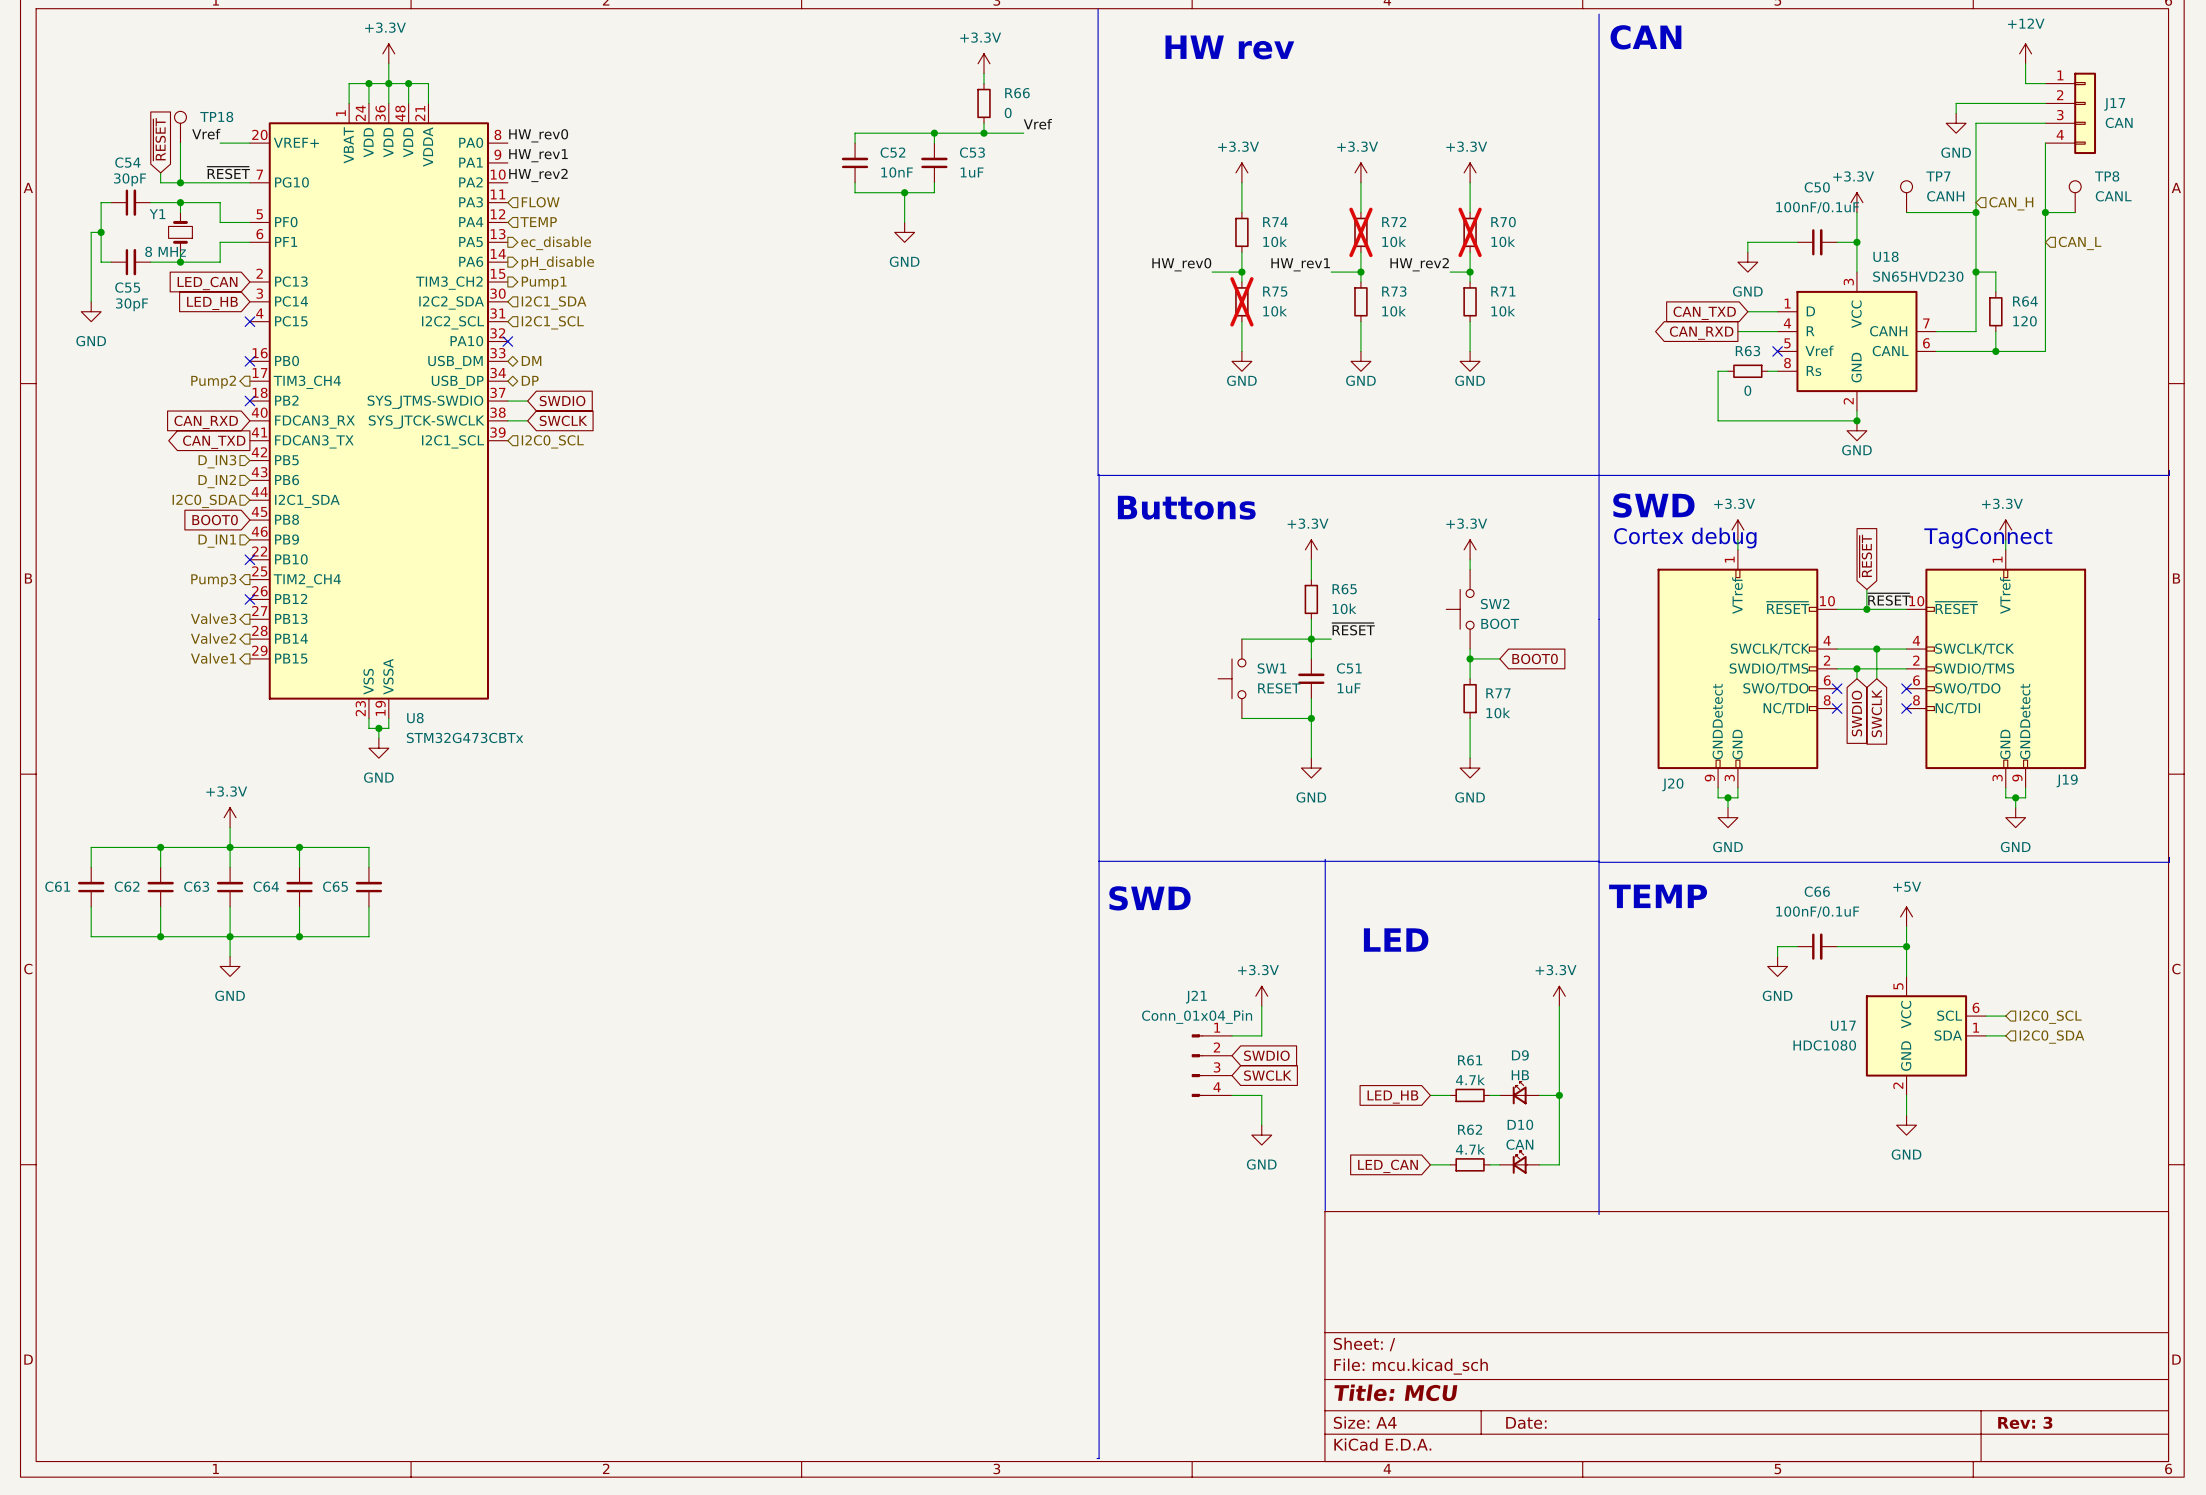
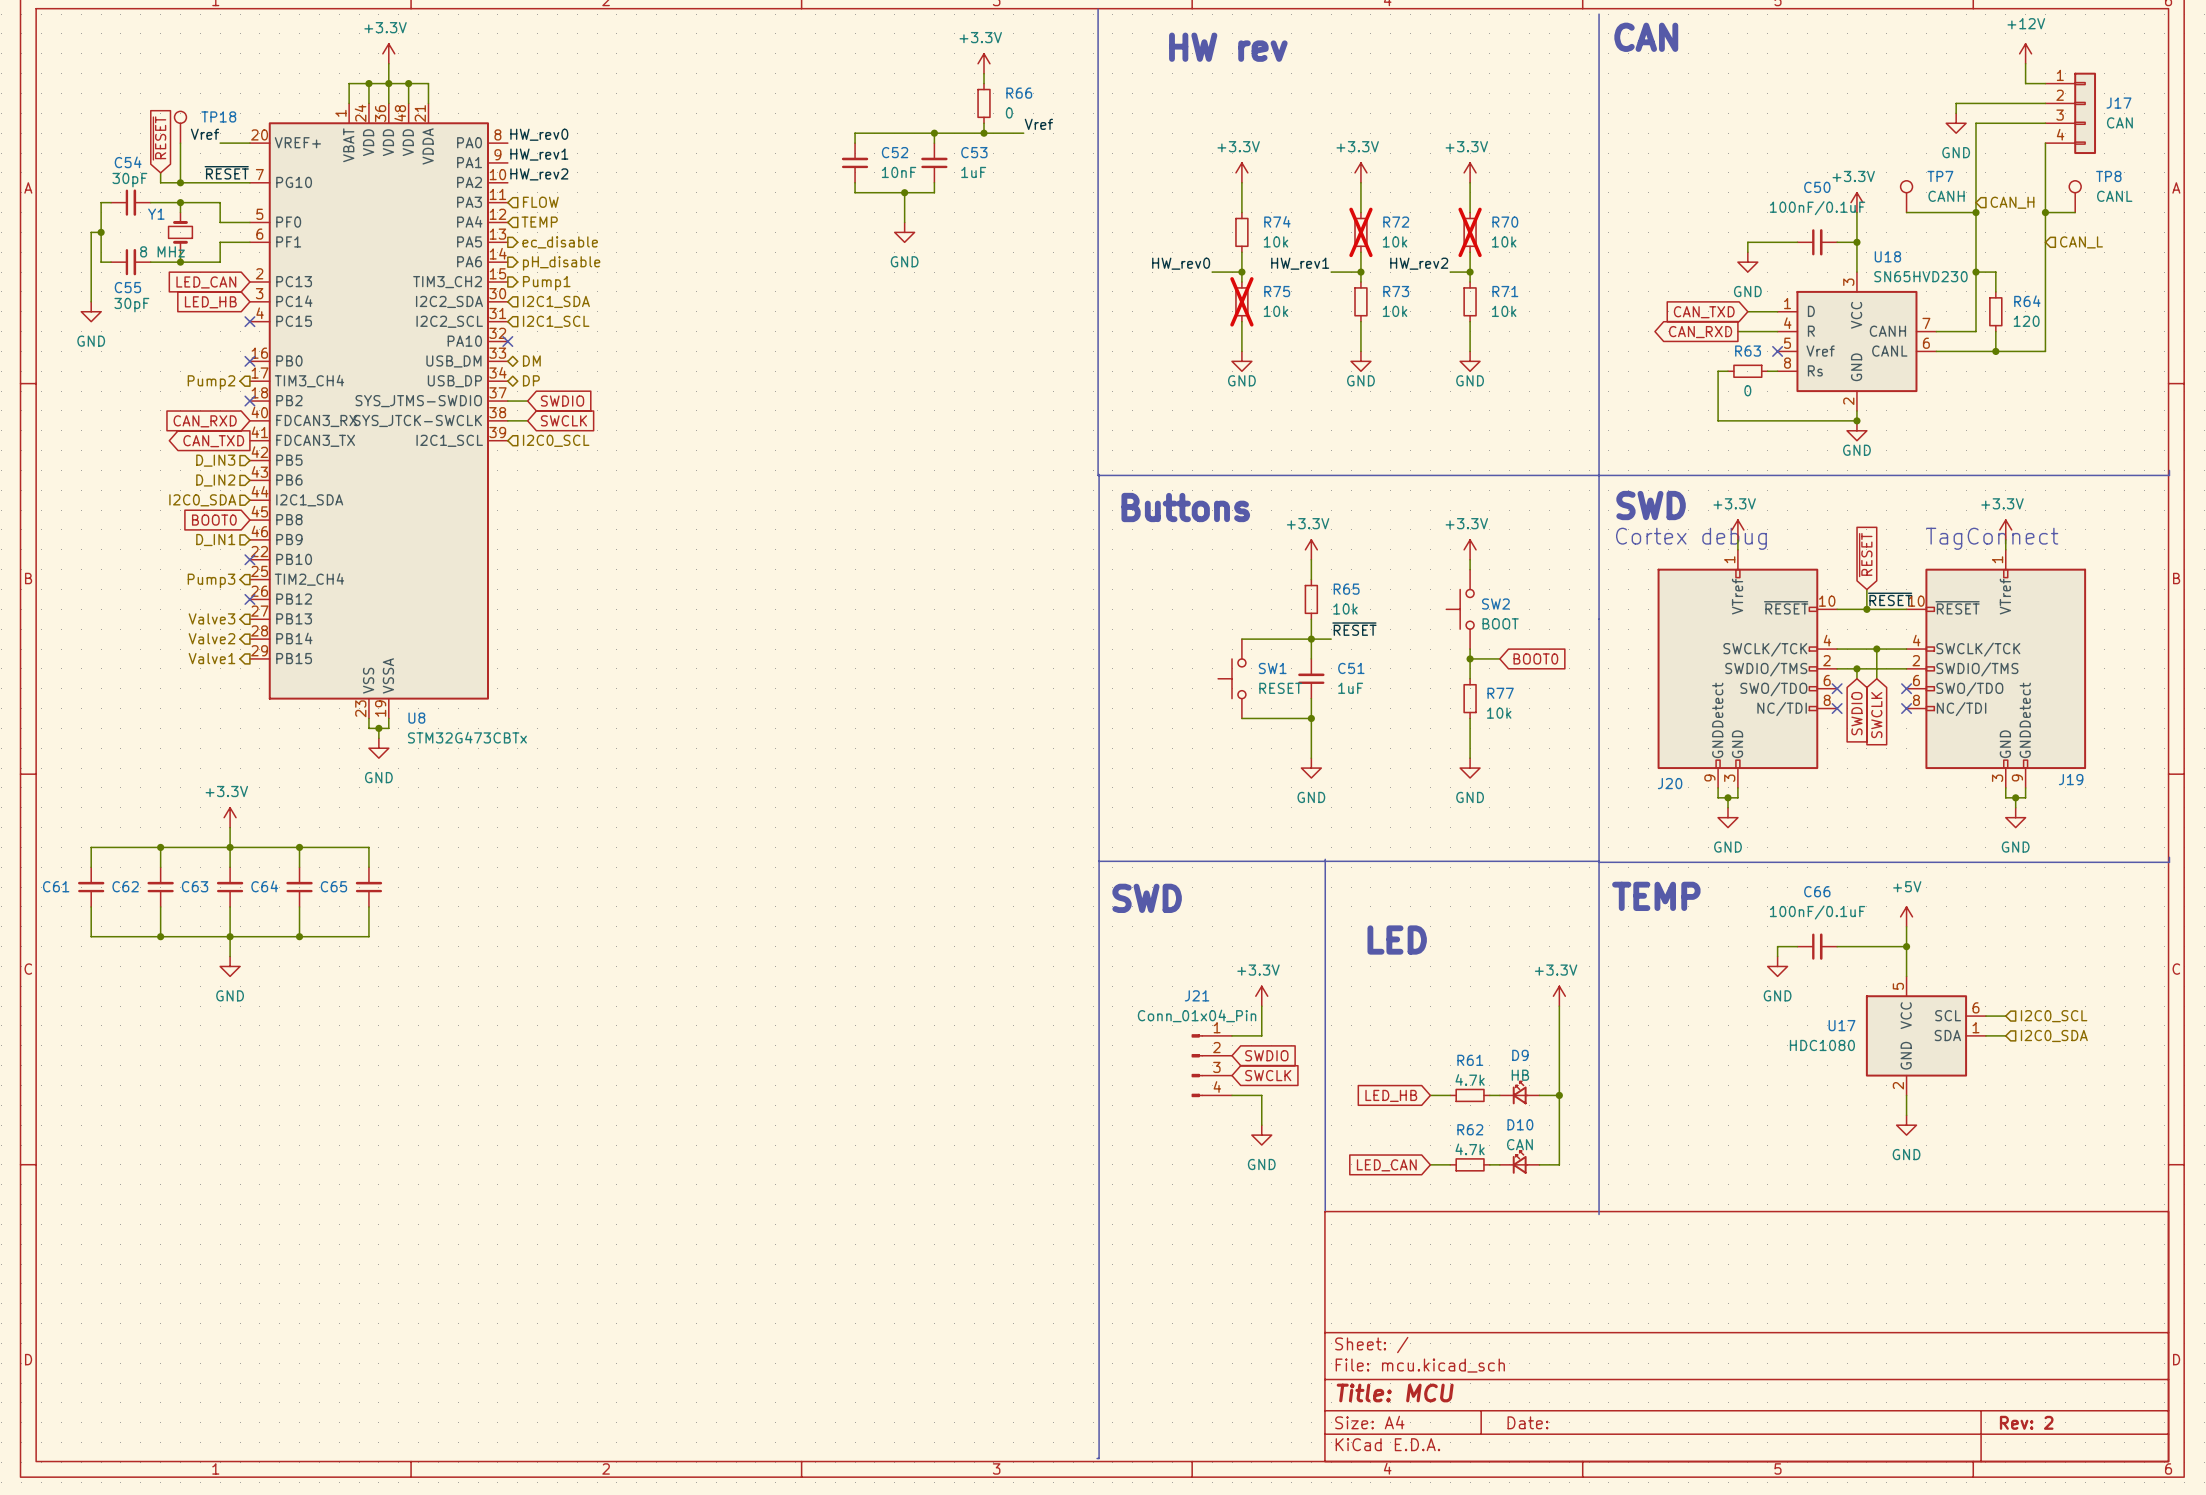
title block: Rev: 3 (2025, 1422) -> Rev: 2 (2026, 1422)

